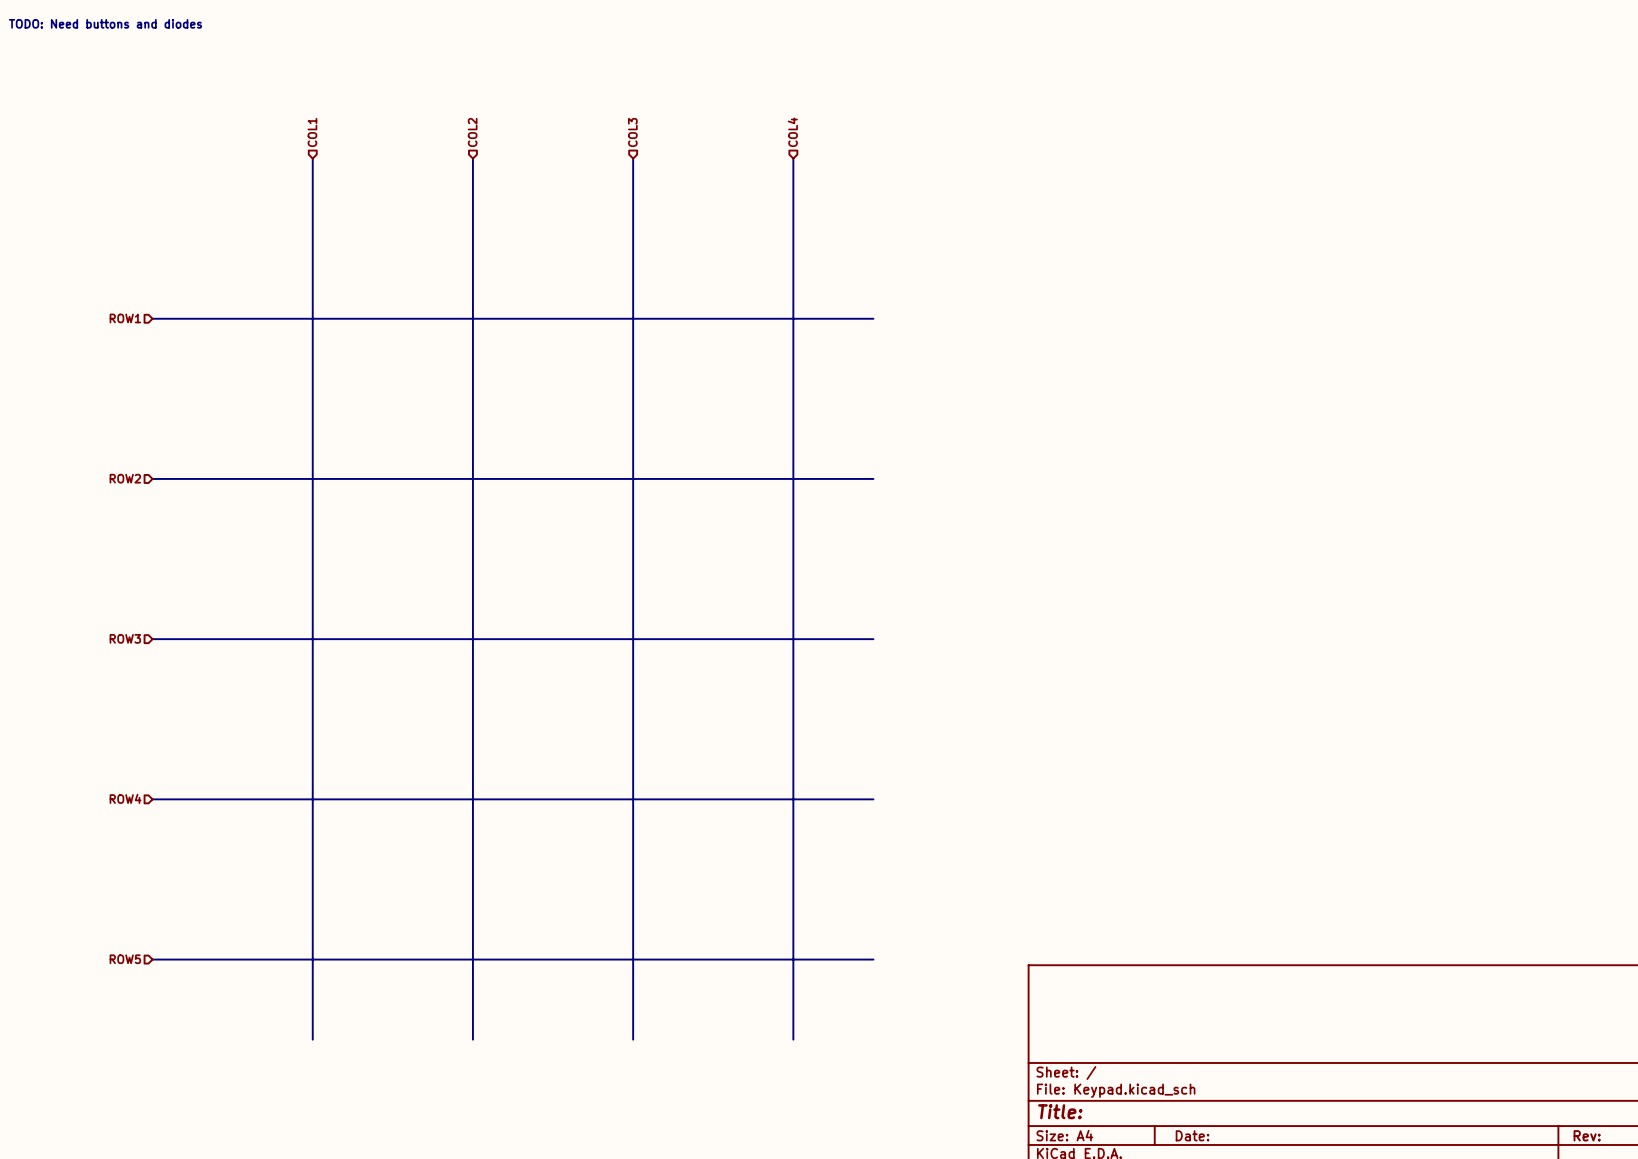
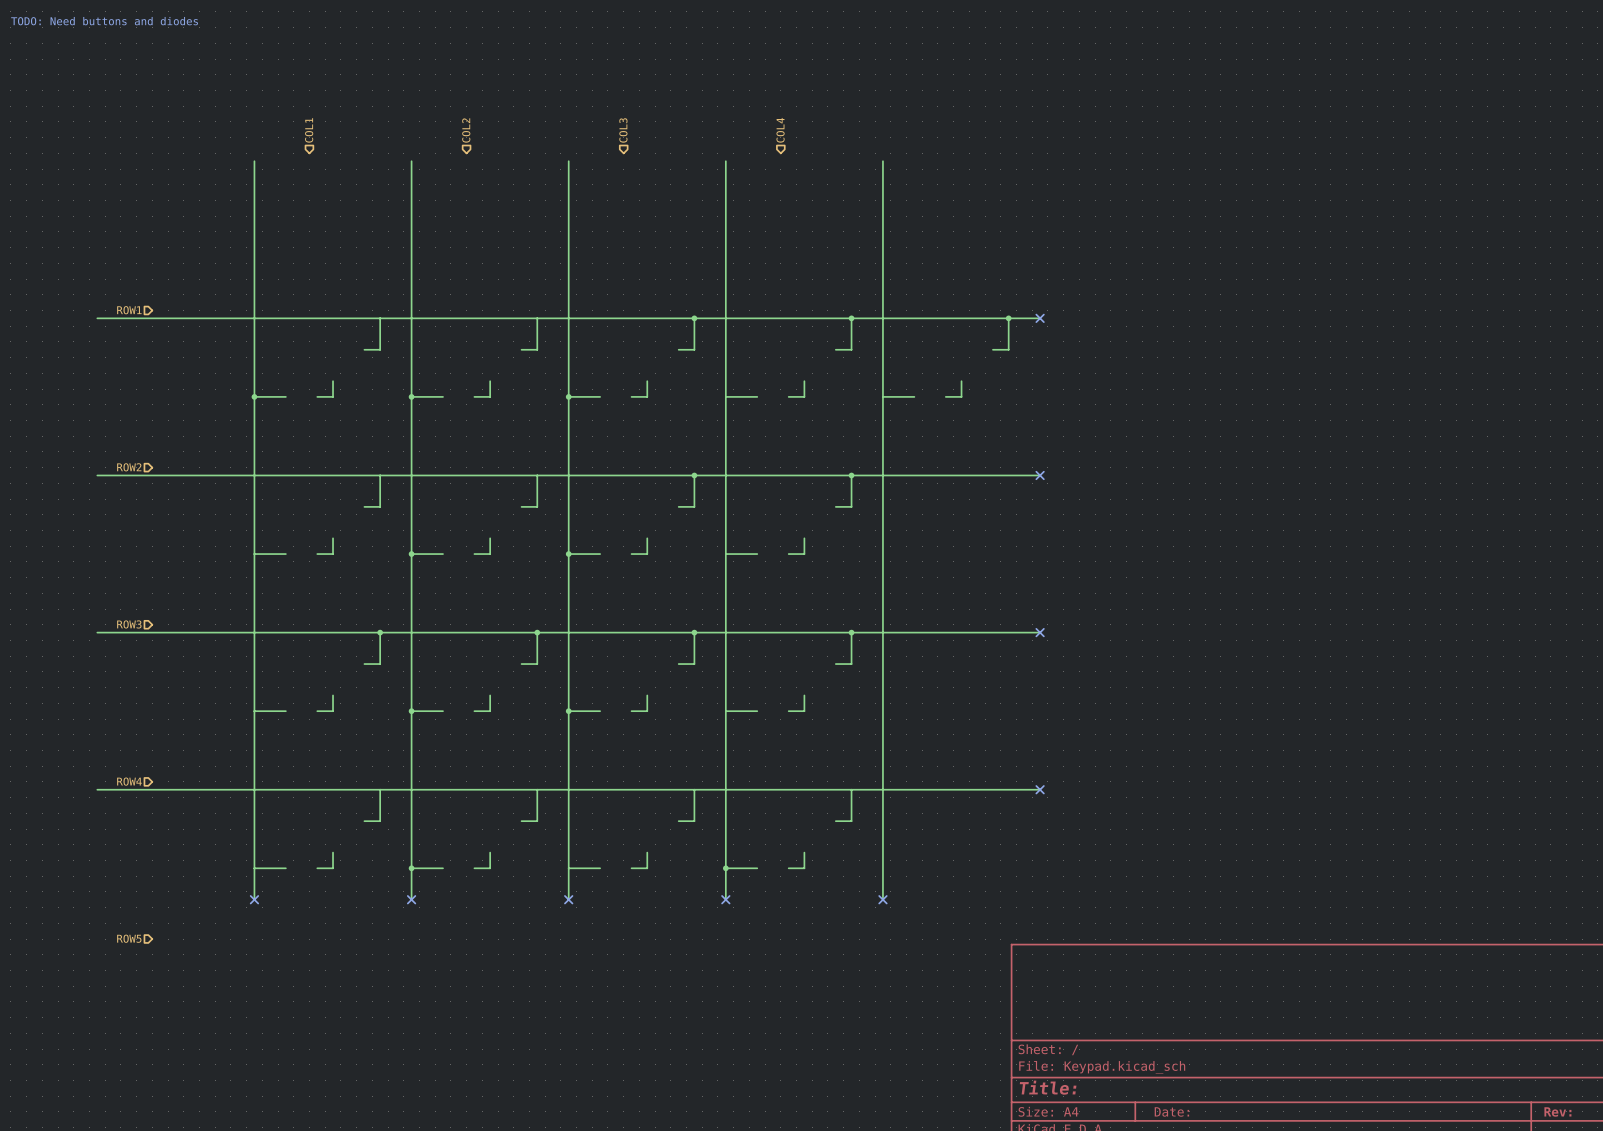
wire: (312, 158) (312, 1039) -> none
wire: (472, 158) (472, 1039) -> none
wire: (633, 158) (633, 1039) -> none
wire: (793, 158) (793, 1039) -> none
wire: none -> (254, 161) (254, 899)
wire: none -> (411, 161) (411, 899)
wire: none -> (568, 161) (568, 899)
wire: none -> (725, 161) (725, 899)
wire: none -> (882, 161) (882, 899)
wire: (152, 318) (873, 318) -> none
wire: none -> (97, 318) (1040, 318)
wire: none -> (380, 318) (380, 349) (364, 349)
wire: none -> (537, 318) (537, 349) (521, 349)
wire: none -> (694, 318) (694, 349) (678, 349)
junction: none -> (694, 318)
wire: none -> (851, 318) (851, 349) (835, 349)
junction: none -> (851, 318)
wire: none -> (1008, 318) (1008, 349) (992, 349)
junction: none -> (1008, 318)
no-connect mark: none -> (1040, 318)
wire: none -> (333, 381) (333, 396) (317, 396)
wire: none -> (490, 381) (490, 396) (474, 396)
wire: none -> (647, 381) (647, 396) (631, 396)
wire: none -> (804, 381) (804, 396) (788, 396)
wire: none -> (961, 381) (961, 396) (945, 396)
wire: none -> (254, 396) (285, 396)
junction: none -> (254, 396)
wire: none -> (411, 396) (443, 396)
junction: none -> (411, 396)
wire: none -> (568, 396) (600, 396)
junction: none -> (568, 396)
wire: none -> (725, 396) (757, 396)
wire: none -> (882, 396) (914, 396)
wire: (152, 478) (873, 478) -> none
wire: none -> (97, 475) (1040, 475)
wire: none -> (380, 475) (380, 506) (364, 506)
wire: none -> (537, 475) (537, 506) (521, 506)
wire: none -> (694, 475) (694, 506) (678, 506)
junction: none -> (694, 475)
wire: none -> (851, 475) (851, 506) (835, 506)
junction: none -> (851, 475)
no-connect mark: none -> (1040, 475)
wire: none -> (333, 538) (333, 554) (317, 554)
wire: none -> (490, 538) (490, 554) (474, 554)
wire: none -> (647, 538) (647, 554) (631, 554)
wire: none -> (804, 538) (804, 554) (788, 554)
wire: none -> (254, 554) (285, 554)
wire: none -> (411, 554) (443, 554)
junction: none -> (411, 554)
wire: none -> (568, 554) (600, 554)
junction: none -> (568, 554)
wire: none -> (725, 554) (757, 554)
wire: (152, 639) (873, 639) -> none
wire: none -> (97, 632) (1040, 632)
wire: none -> (380, 632) (380, 664) (364, 664)
junction: none -> (380, 632)
wire: none -> (537, 632) (537, 664) (521, 664)
junction: none -> (537, 632)
wire: none -> (694, 632) (694, 664) (678, 664)
junction: none -> (694, 632)
wire: none -> (851, 632) (851, 664) (835, 664)
junction: none -> (851, 632)
no-connect mark: none -> (1040, 632)
wire: none -> (333, 695) (333, 711) (317, 711)
wire: none -> (490, 695) (490, 711) (474, 711)
wire: none -> (647, 695) (647, 711) (631, 711)
wire: none -> (804, 695) (804, 711) (788, 711)
wire: none -> (254, 711) (285, 711)
wire: none -> (411, 711) (443, 711)
junction: none -> (411, 711)
wire: none -> (568, 711) (600, 711)
junction: none -> (568, 711)
wire: none -> (725, 711) (757, 711)
wire: (152, 799) (873, 799) -> none
wire: none -> (97, 789) (1040, 789)
wire: none -> (380, 789) (380, 821) (364, 821)
wire: none -> (537, 789) (537, 821) (521, 821)
wire: none -> (694, 789) (694, 821) (678, 821)
wire: none -> (851, 789) (851, 821) (835, 821)
no-connect mark: none -> (1040, 789)
wire: none -> (333, 852) (333, 868) (317, 868)
wire: none -> (490, 852) (490, 868) (474, 868)
wire: none -> (647, 852) (647, 868) (631, 868)
wire: none -> (804, 852) (804, 868) (788, 868)
wire: none -> (254, 868) (285, 868)
wire: none -> (411, 868) (443, 868)
junction: none -> (411, 868)
wire: none -> (568, 868) (600, 868)
wire: none -> (725, 868) (757, 868)
junction: none -> (725, 868)
no-connect mark: none -> (254, 899)
no-connect mark: none -> (411, 899)
no-connect mark: none -> (568, 899)
no-connect mark: none -> (725, 899)
no-connect mark: none -> (882, 899)
wire: (152, 959) (873, 959) -> none

